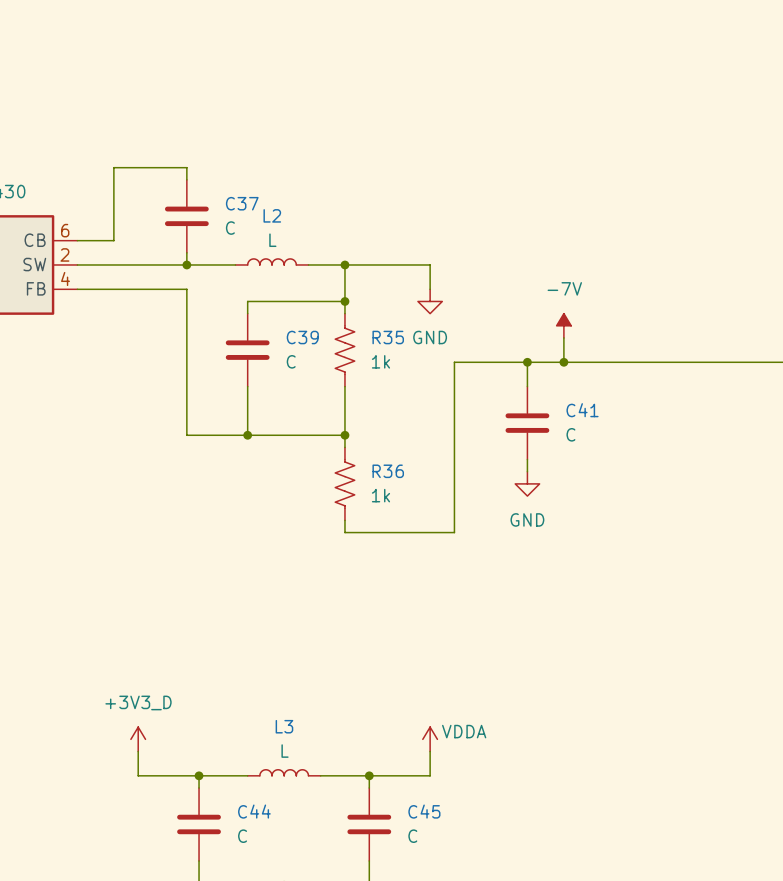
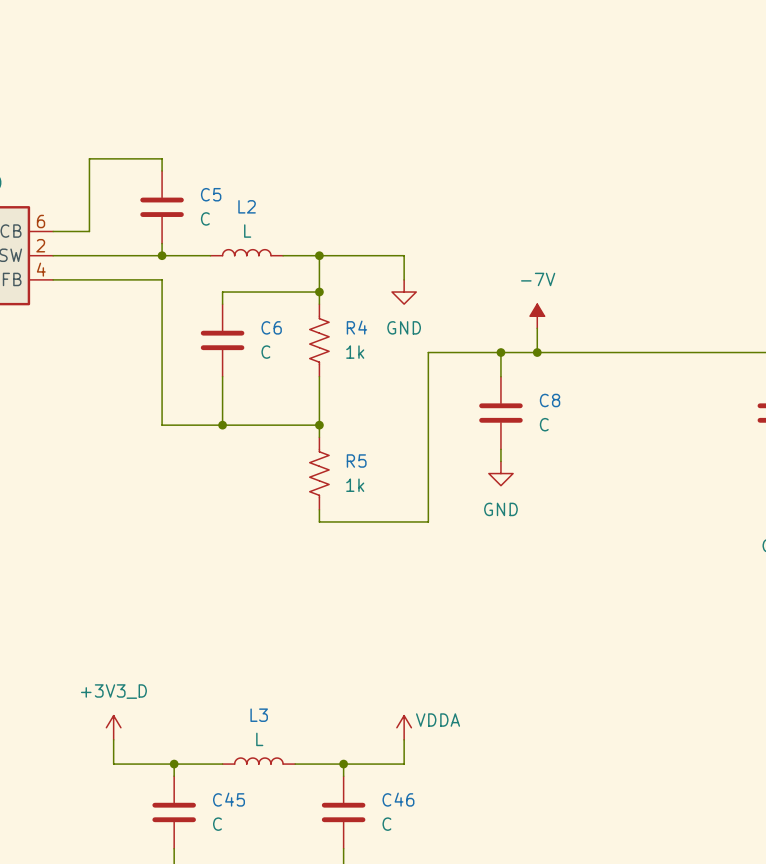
C37 name: C37 (242, 203) -> C5 (211, 194)
C39 name: C39 (302, 337) -> C6 (271, 327)
R35 name: R35 (388, 337) -> R4 (356, 327)
C41 name: C41 (582, 410) -> C8 (550, 400)
R36 name: R36 (388, 471) -> R5 (356, 461)
C44 name: C44 (254, 811) -> C45 (229, 799)
C45 name: C45 (424, 811) -> C46 (398, 799)

